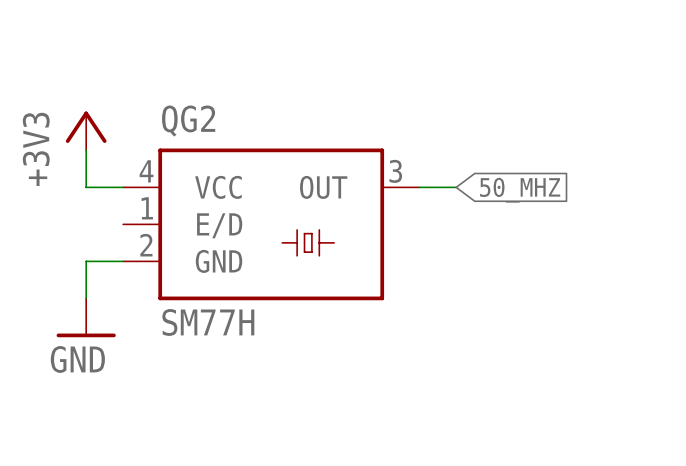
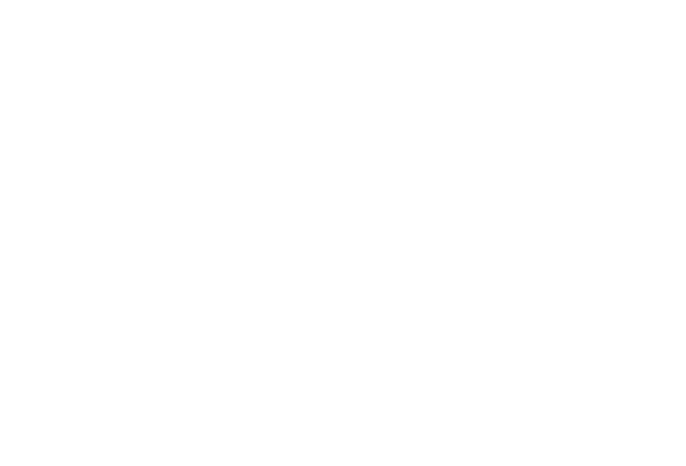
power symbol: +3V3 (86, 130) -> none
wire: (86, 150) (86, 187) (123, 187) -> none
wire: (419, 187) (456, 187) -> none
global label: 50_MHZ (520, 190) -> none
QG2: SM77H (271, 224) -> none
wire: (123, 261) (86, 261) (86, 298) -> none
power symbol: GND (86, 317) -> none

